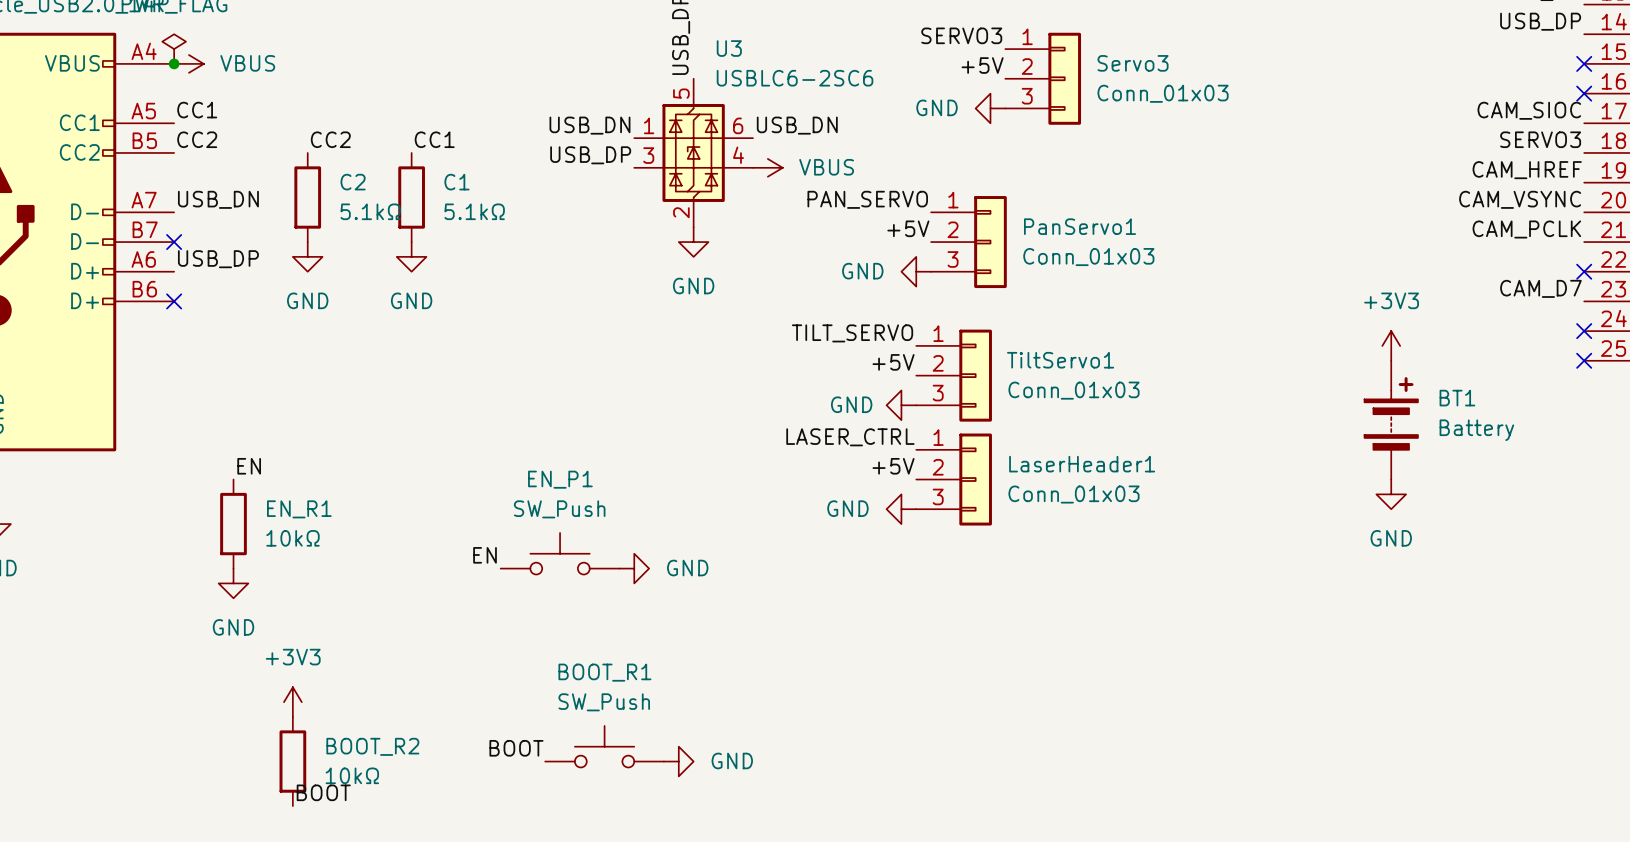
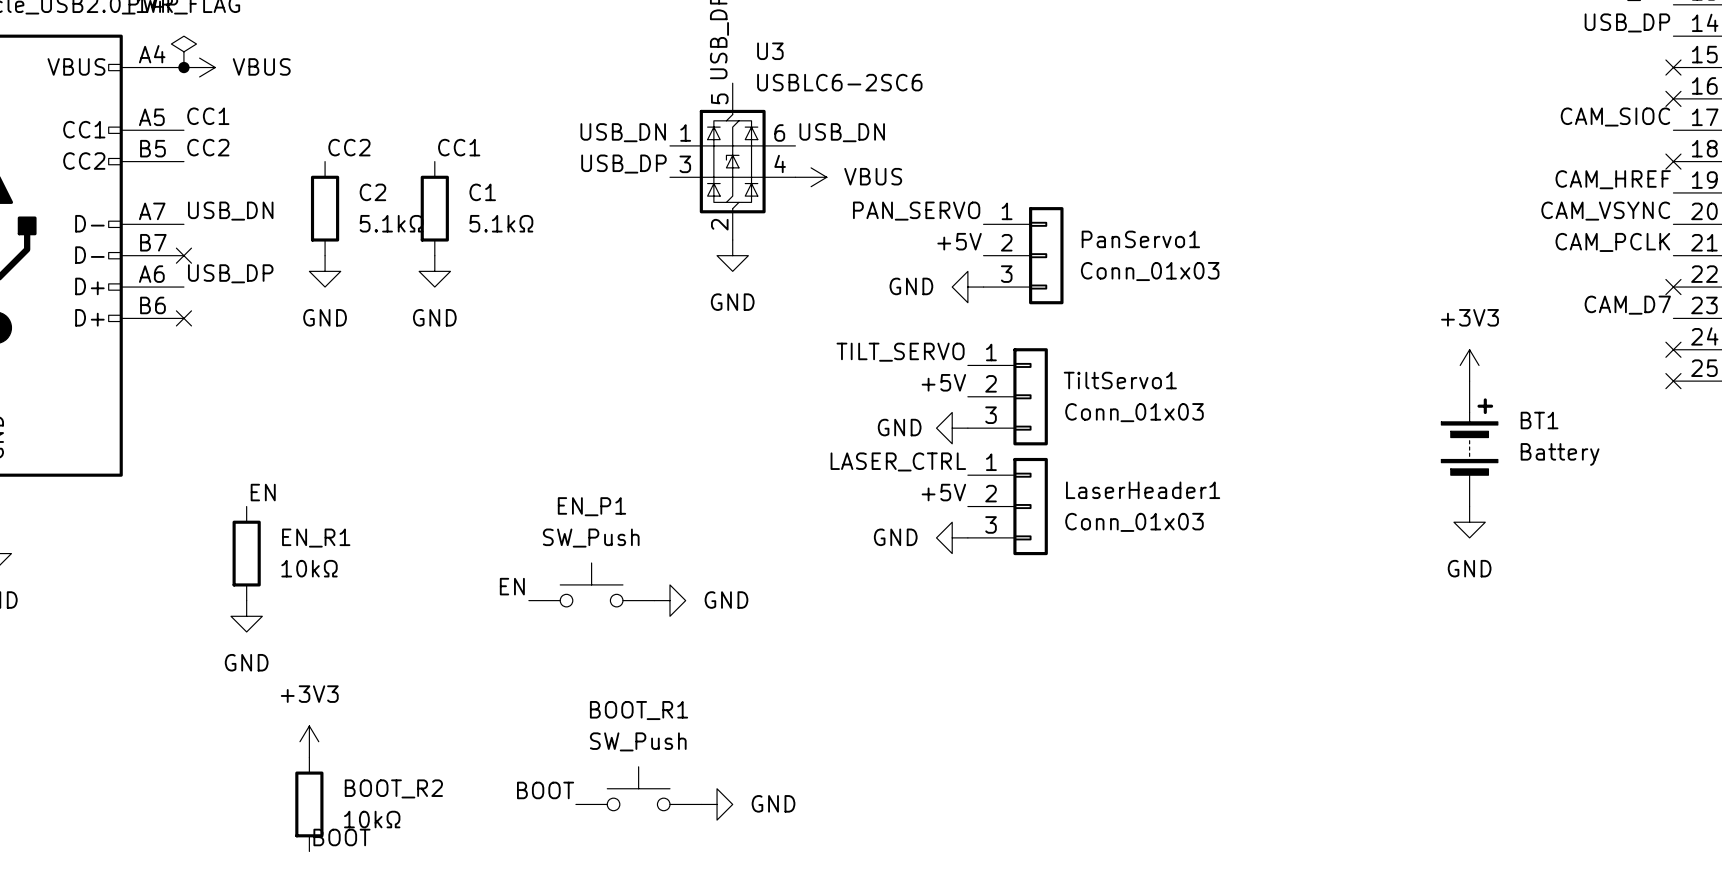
label: SERVO3 (961, 35) -> none
label: +5V (982, 65) -> none
Servo3: Conn_01x03 (1043, 78) -> none
power symbol: GND (990, 108) -> none
label: SERVO3 (1540, 139) -> none
no-connect mark: none -> (1673, 161)

